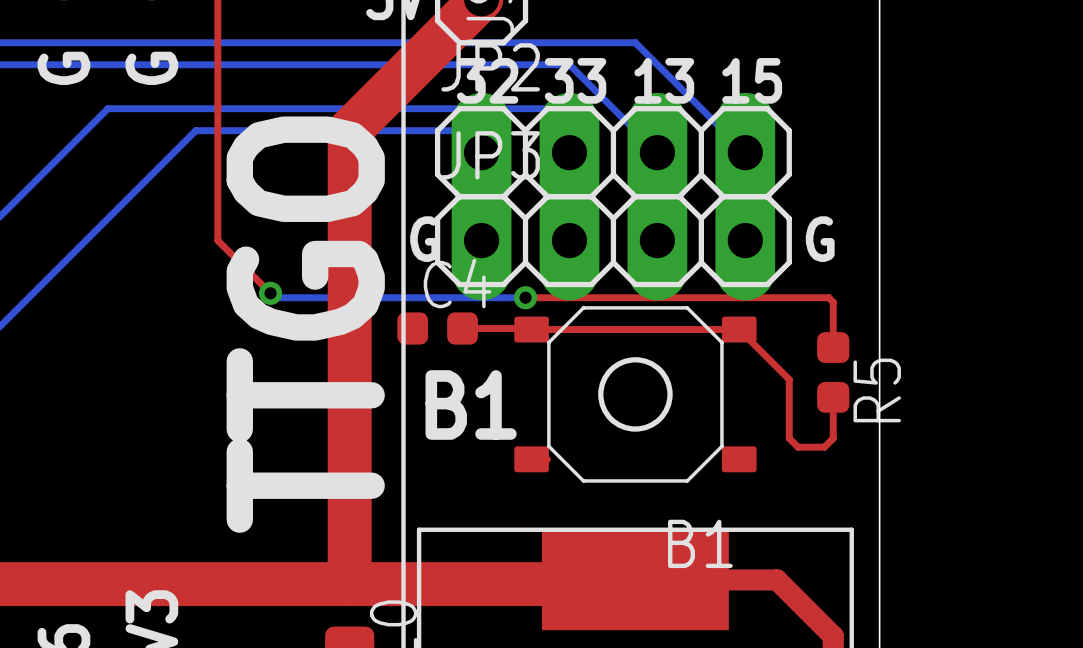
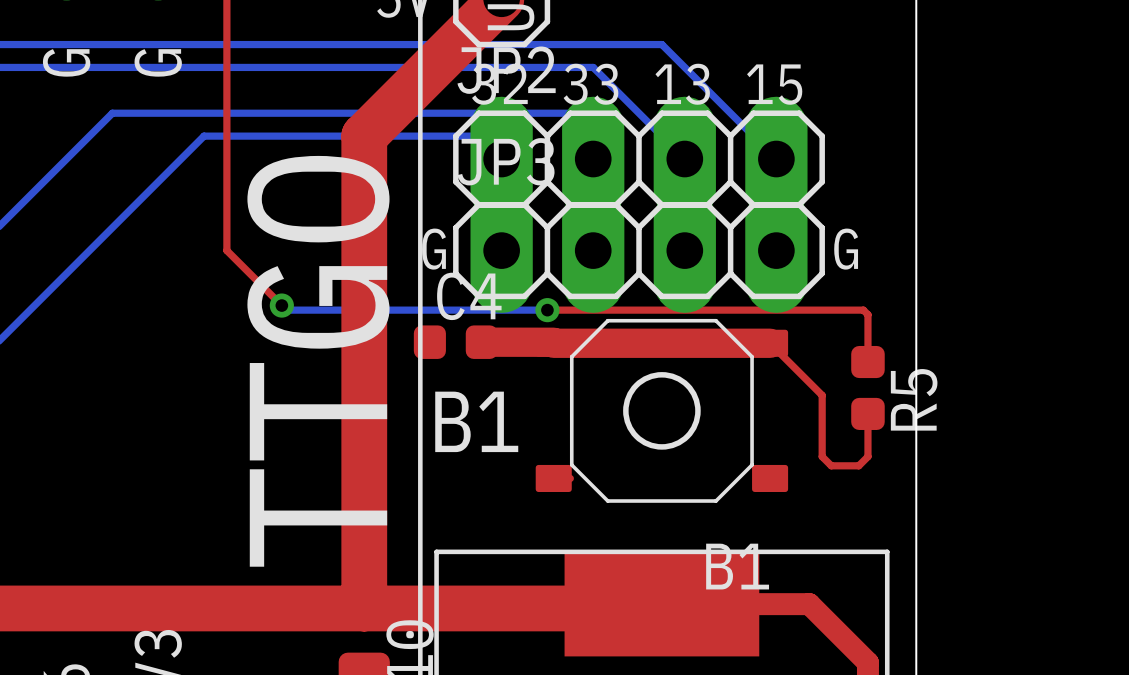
top track width: thin (531, 329) (739, 329) -> thick (553, 343) (770, 343)

